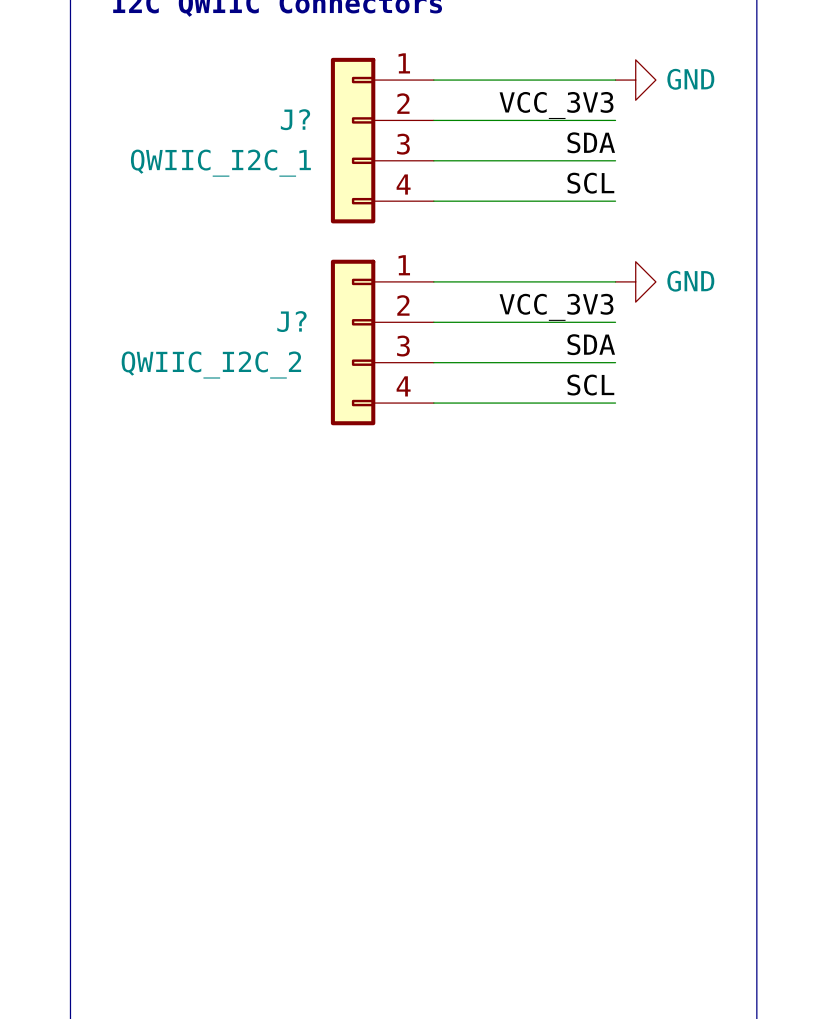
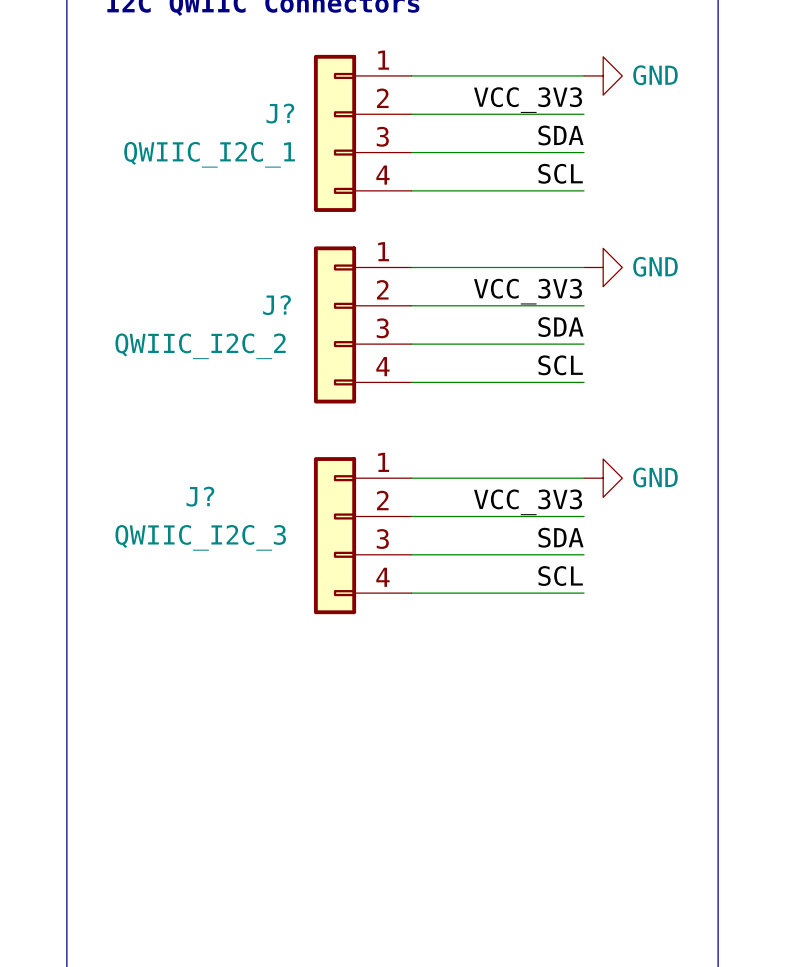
wire: none -> (411, 478) (584, 478)
power symbol: none -> GND (603, 478)
label: none -> VCC_3V3 (528, 502)
wire: none -> (411, 516) (584, 516)
J?: none -> QWIIC_I2C_3 (362, 535)
label: none -> SDA (560, 537)
wire: none -> (411, 554) (584, 554)
label: none -> SCL (560, 576)
wire: none -> (411, 593) (584, 593)

